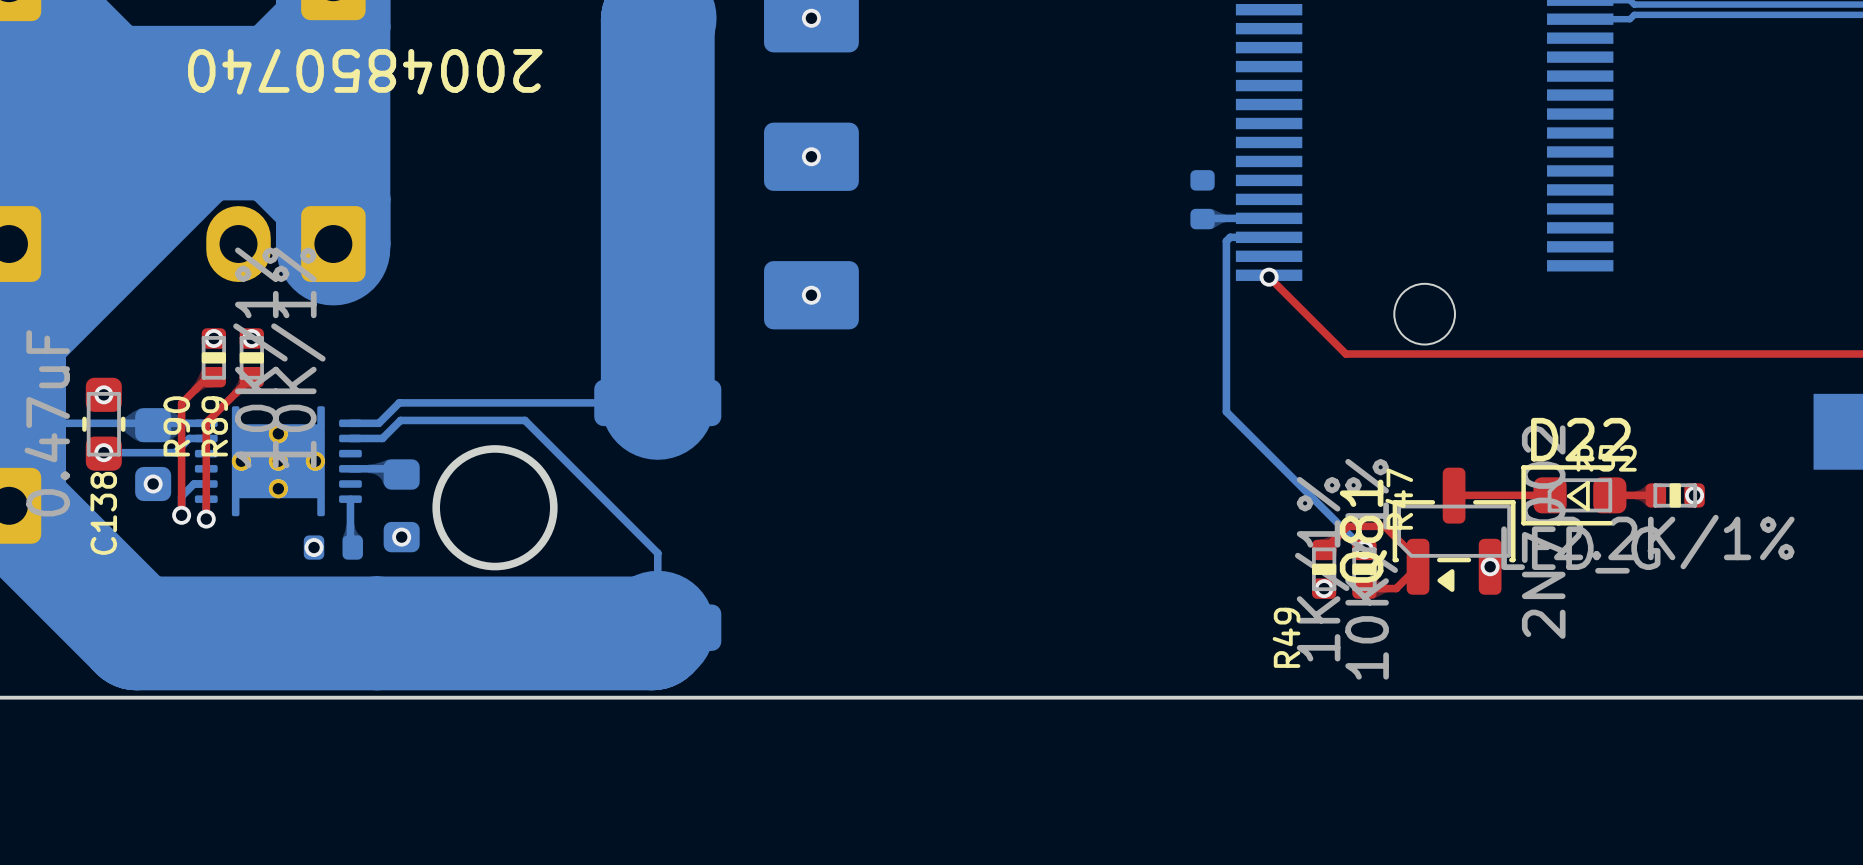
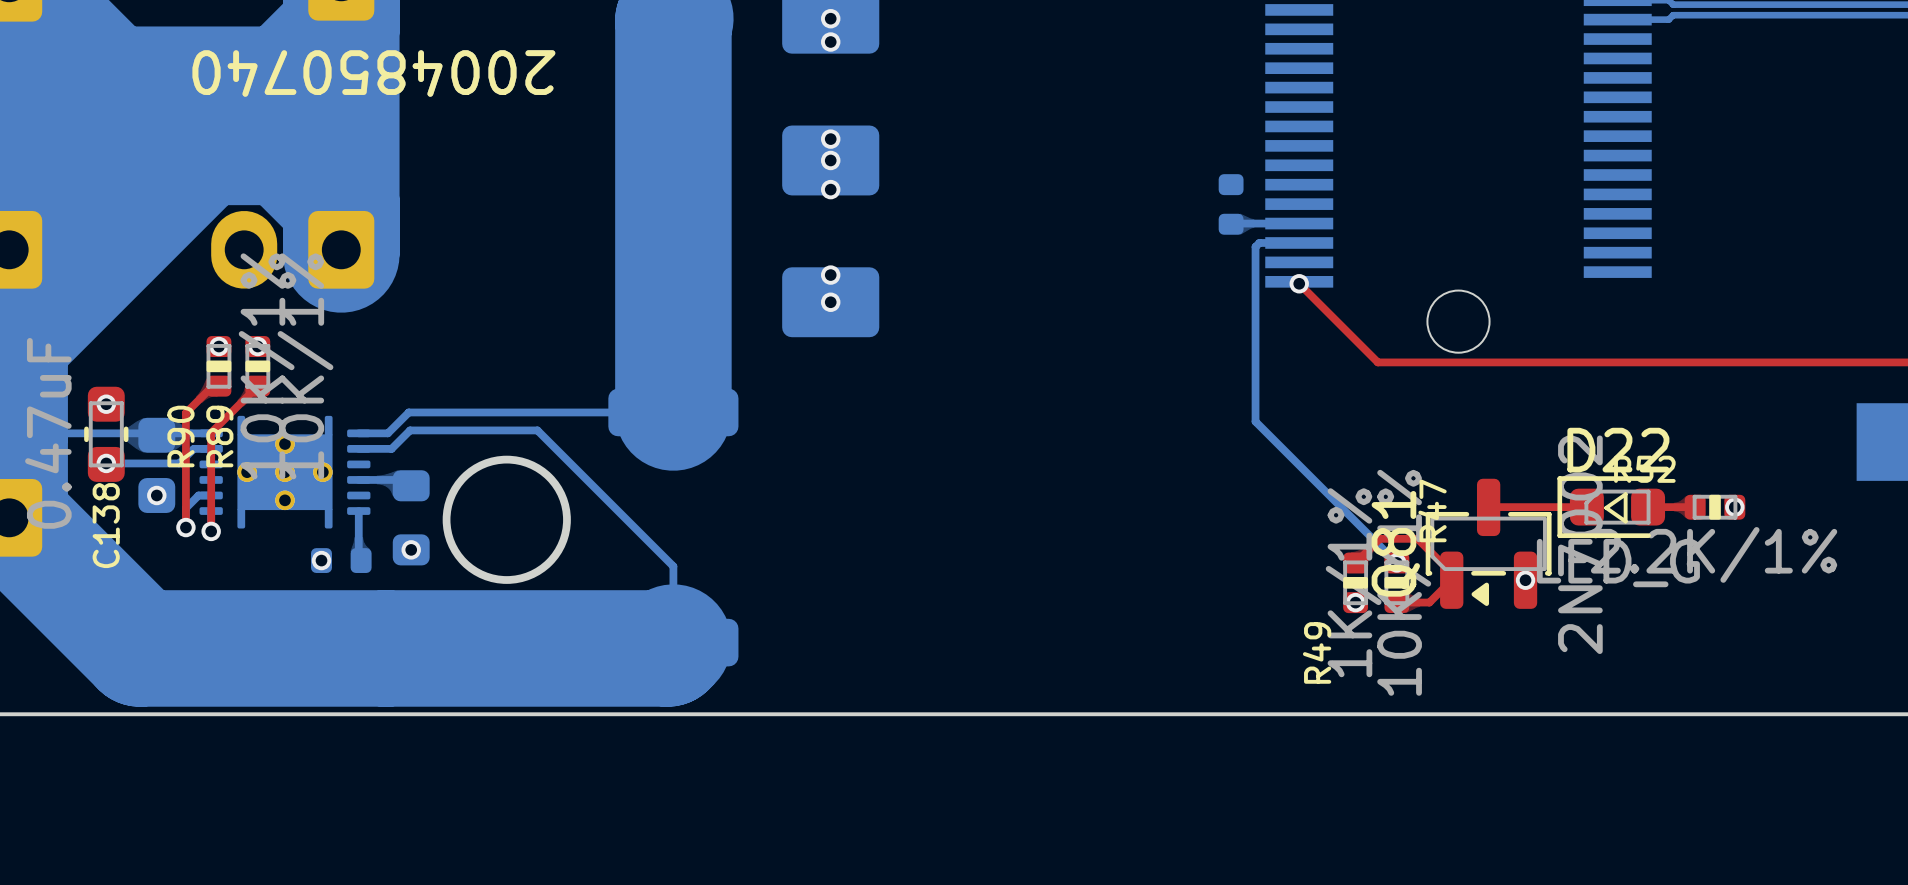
via: none -> (830, 42)
via: none -> (830, 139)
via: none -> (830, 189)
via: none -> (830, 275)

